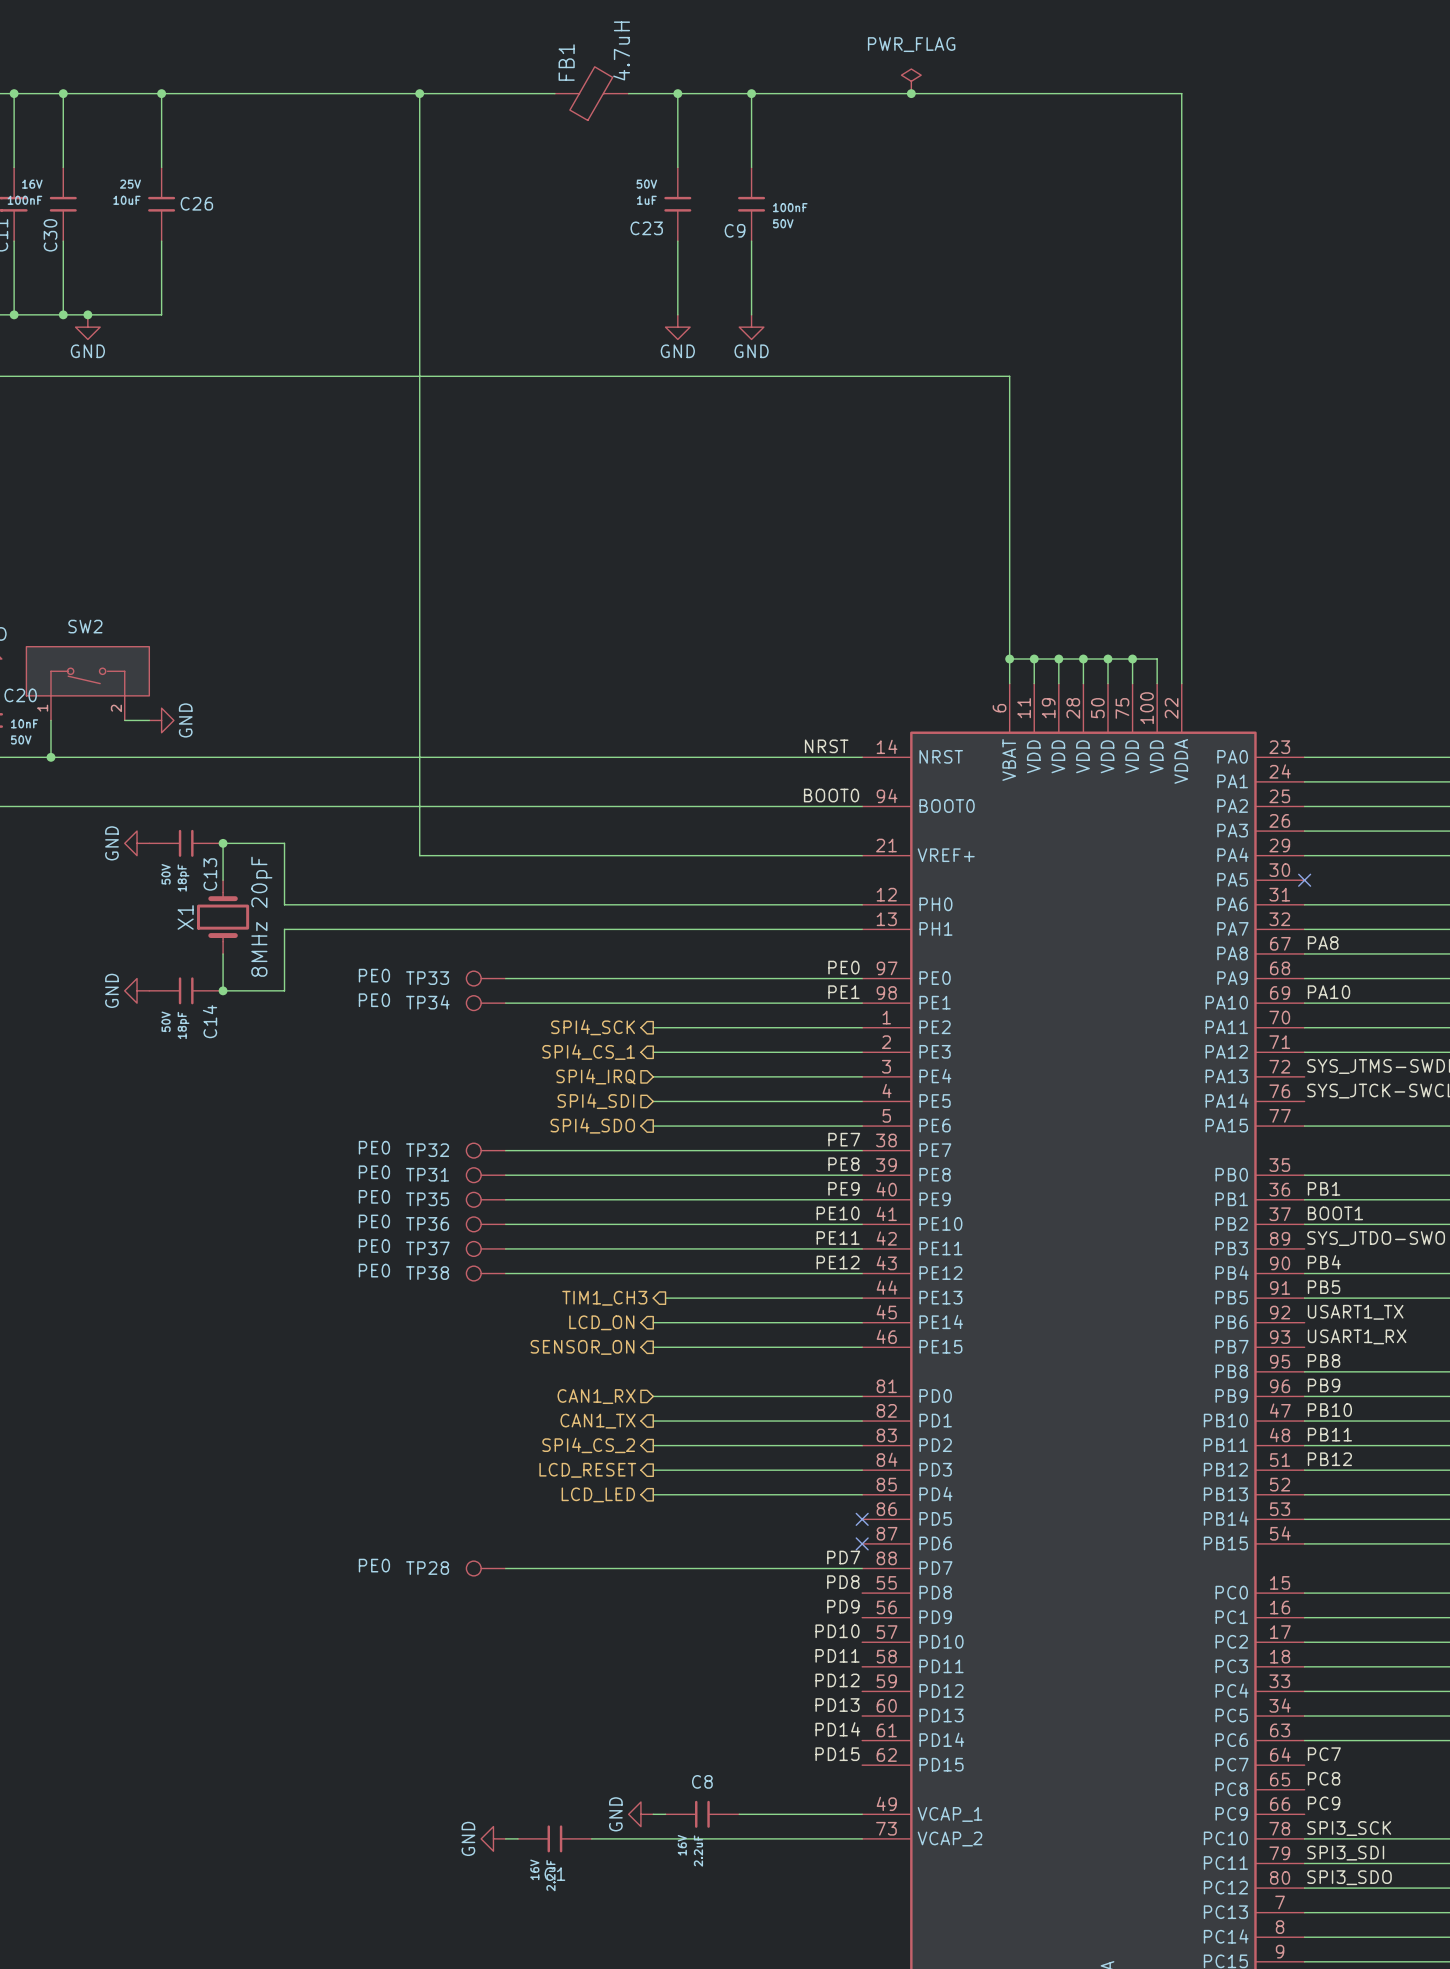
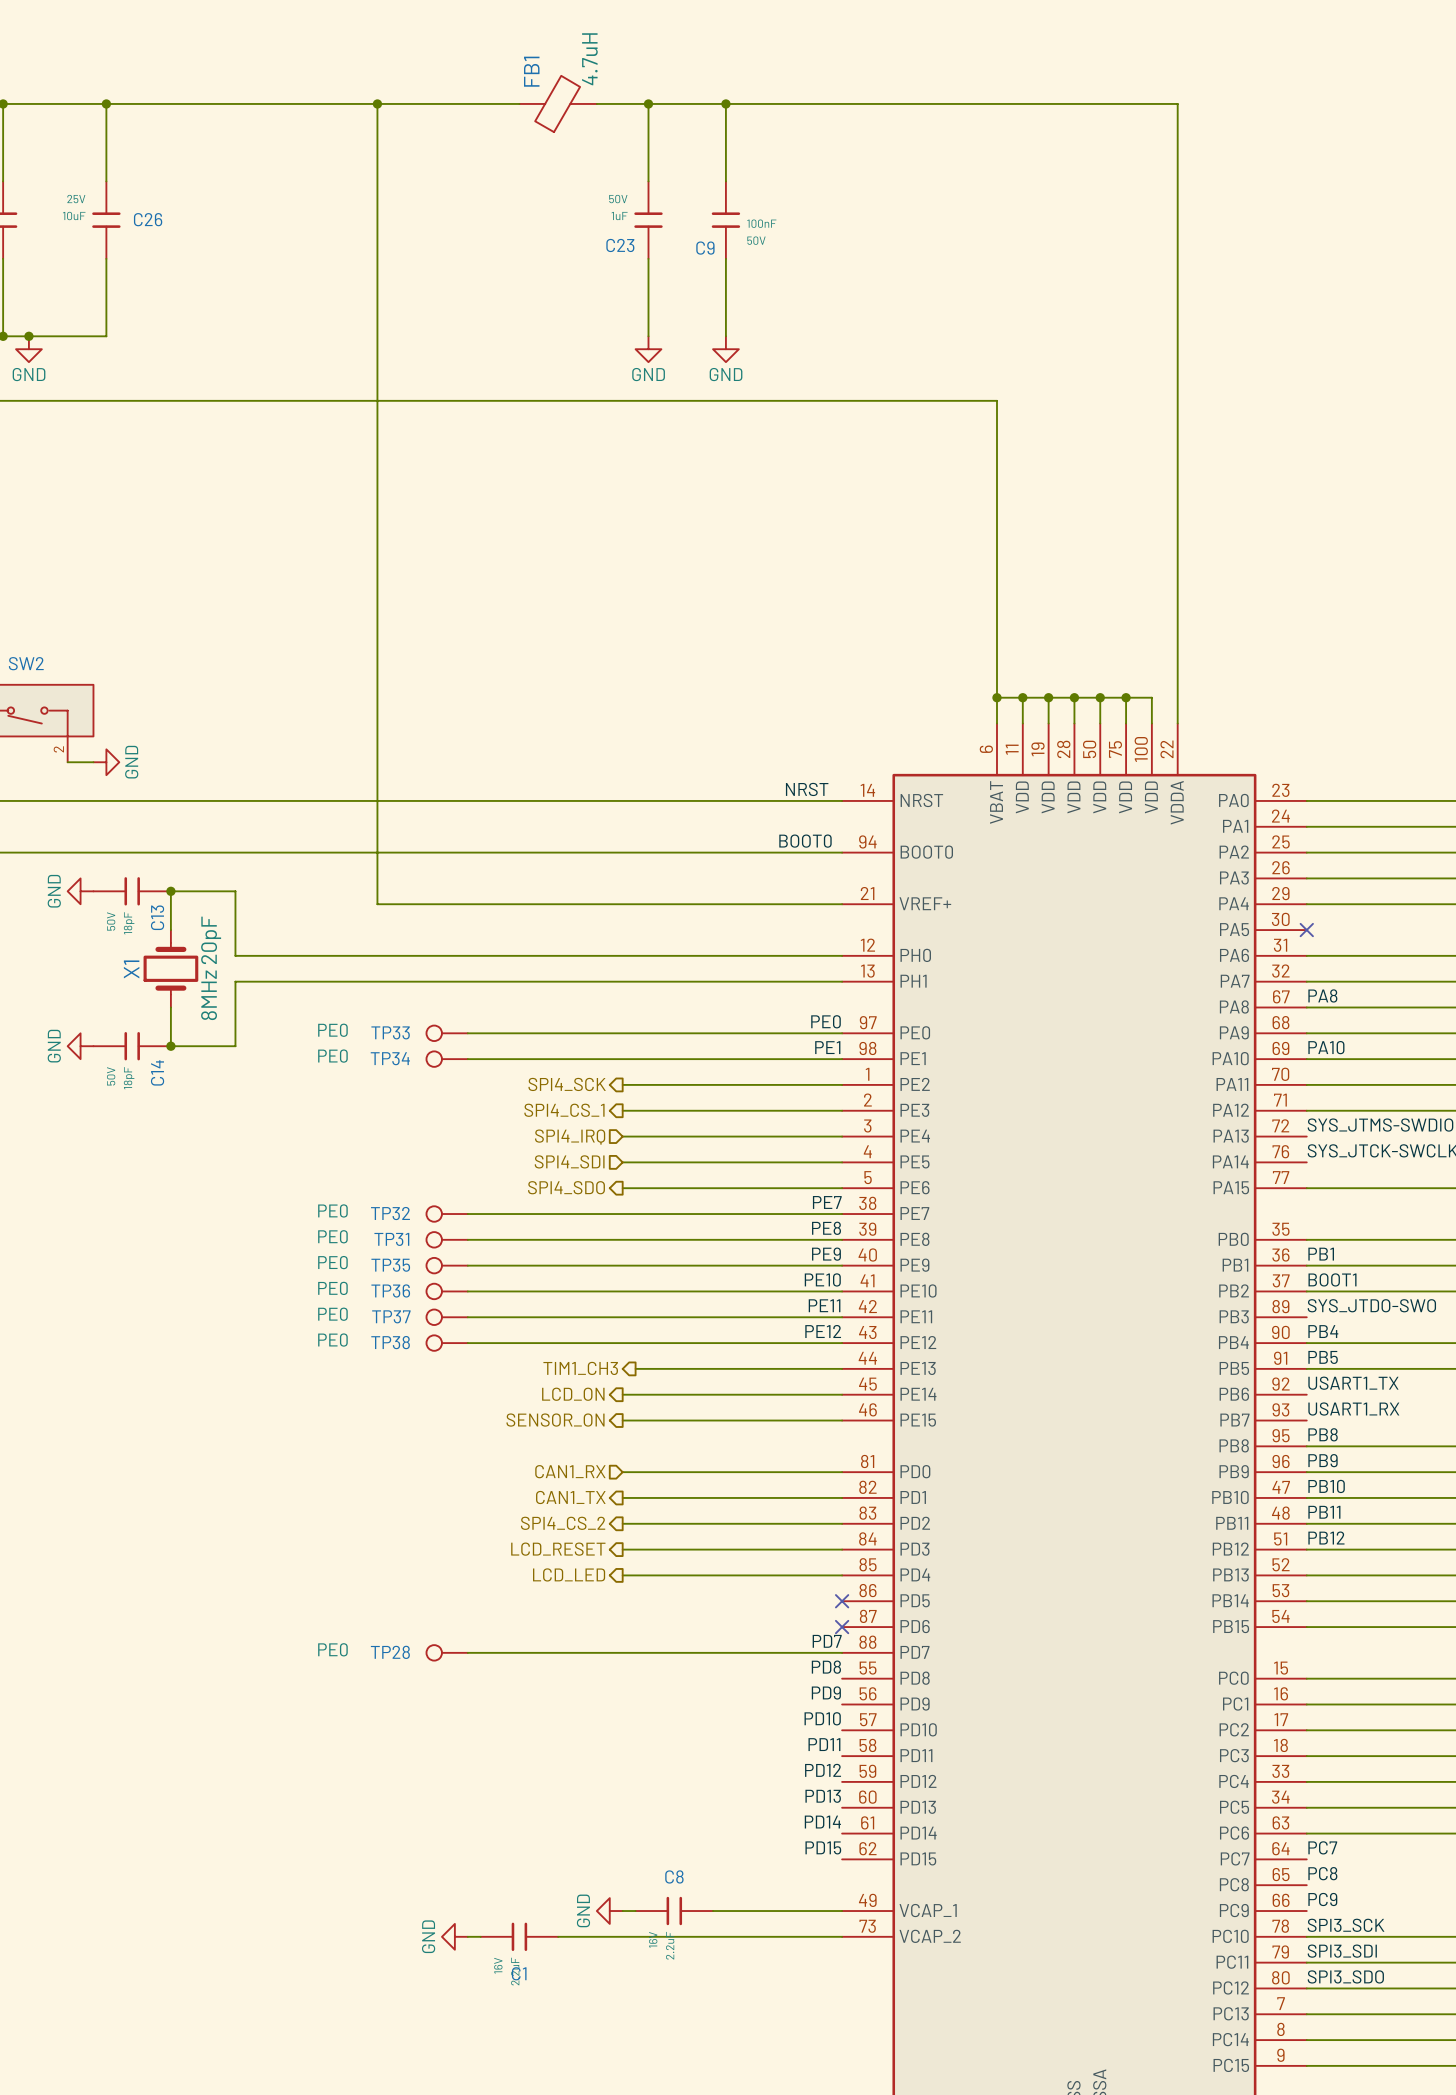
power symbol: PWR_FLAG (911, 81) -> none
junction: (911, 93) -> none

